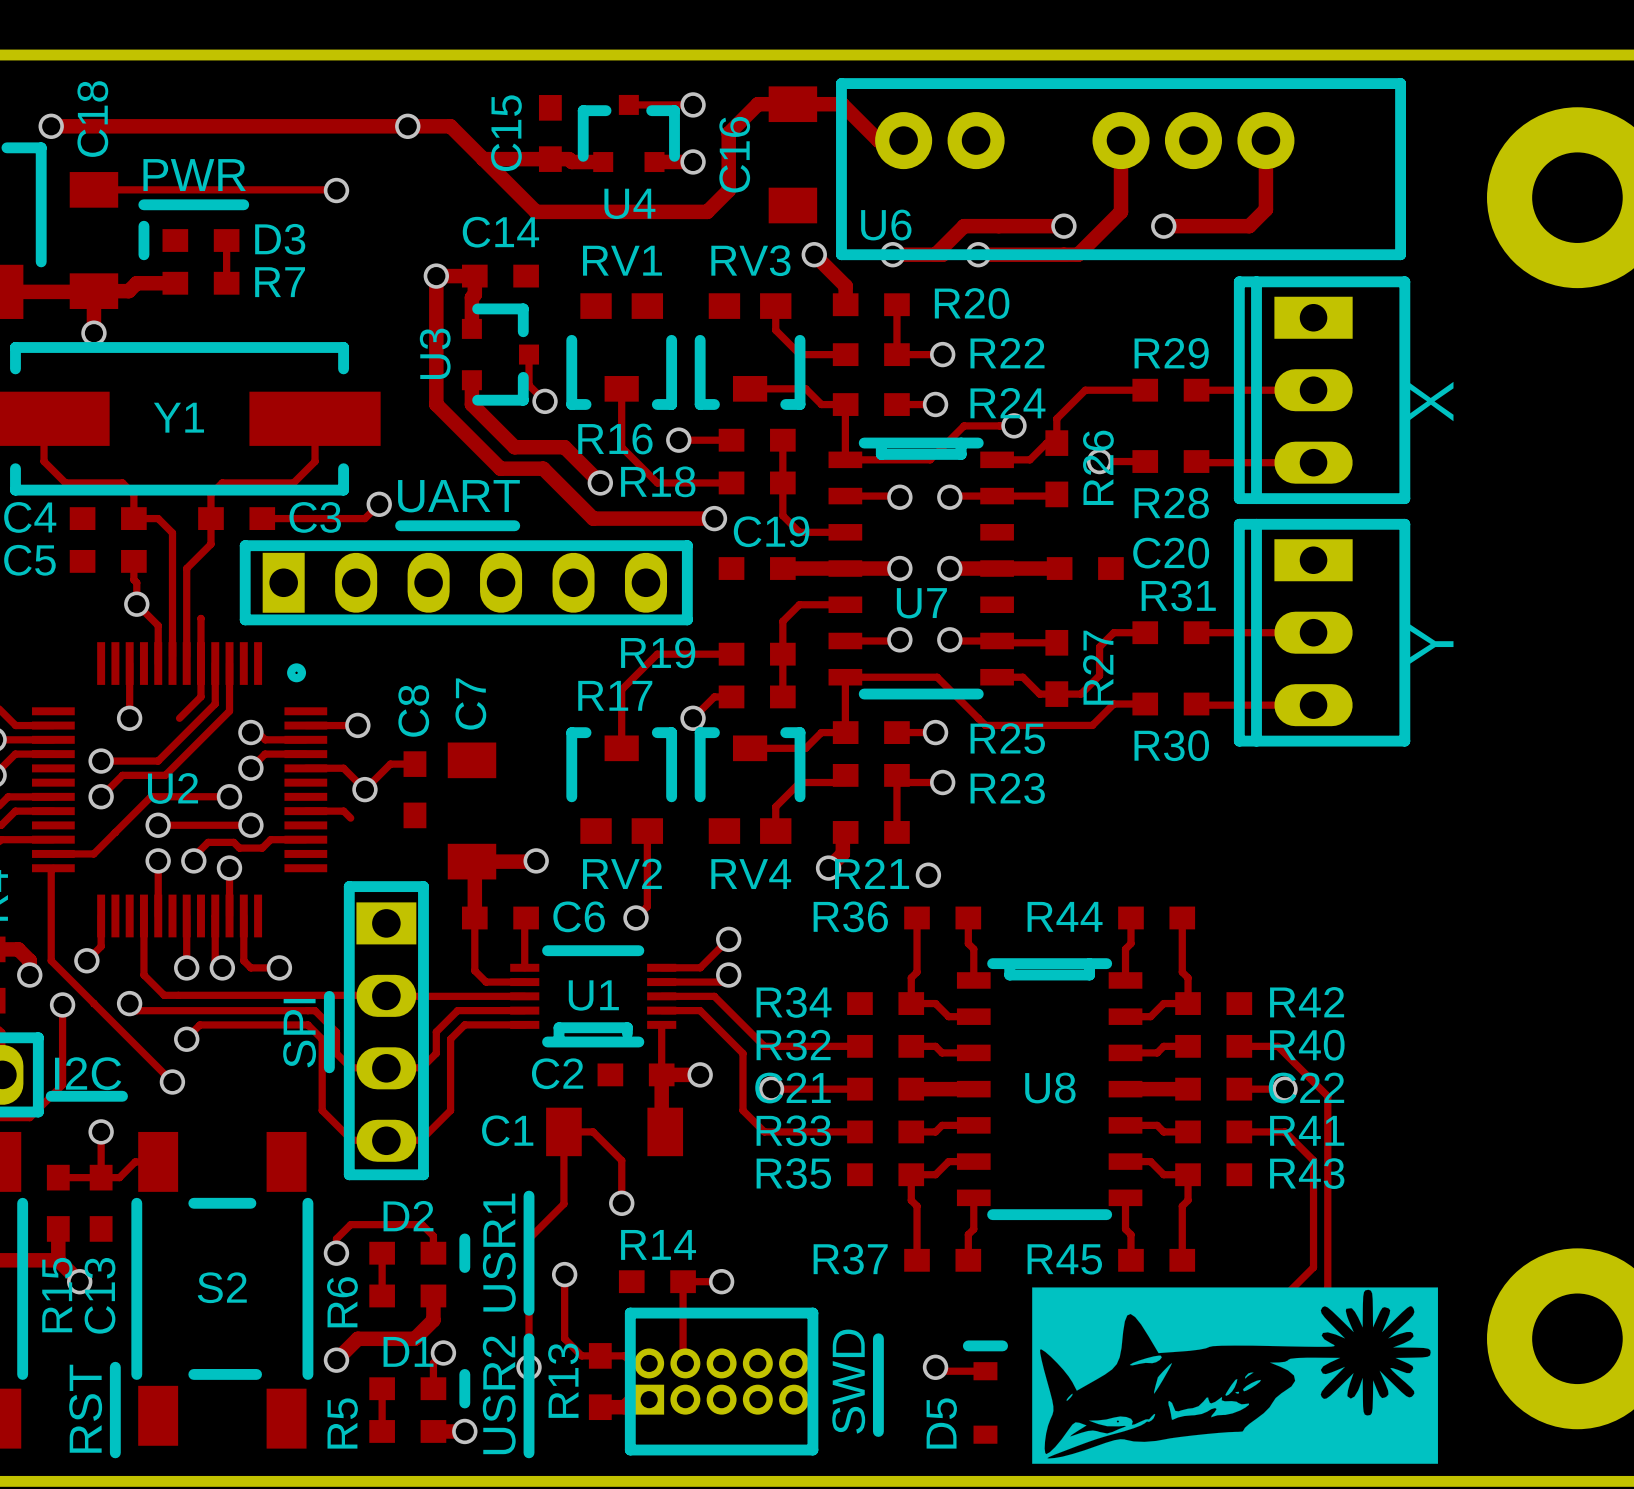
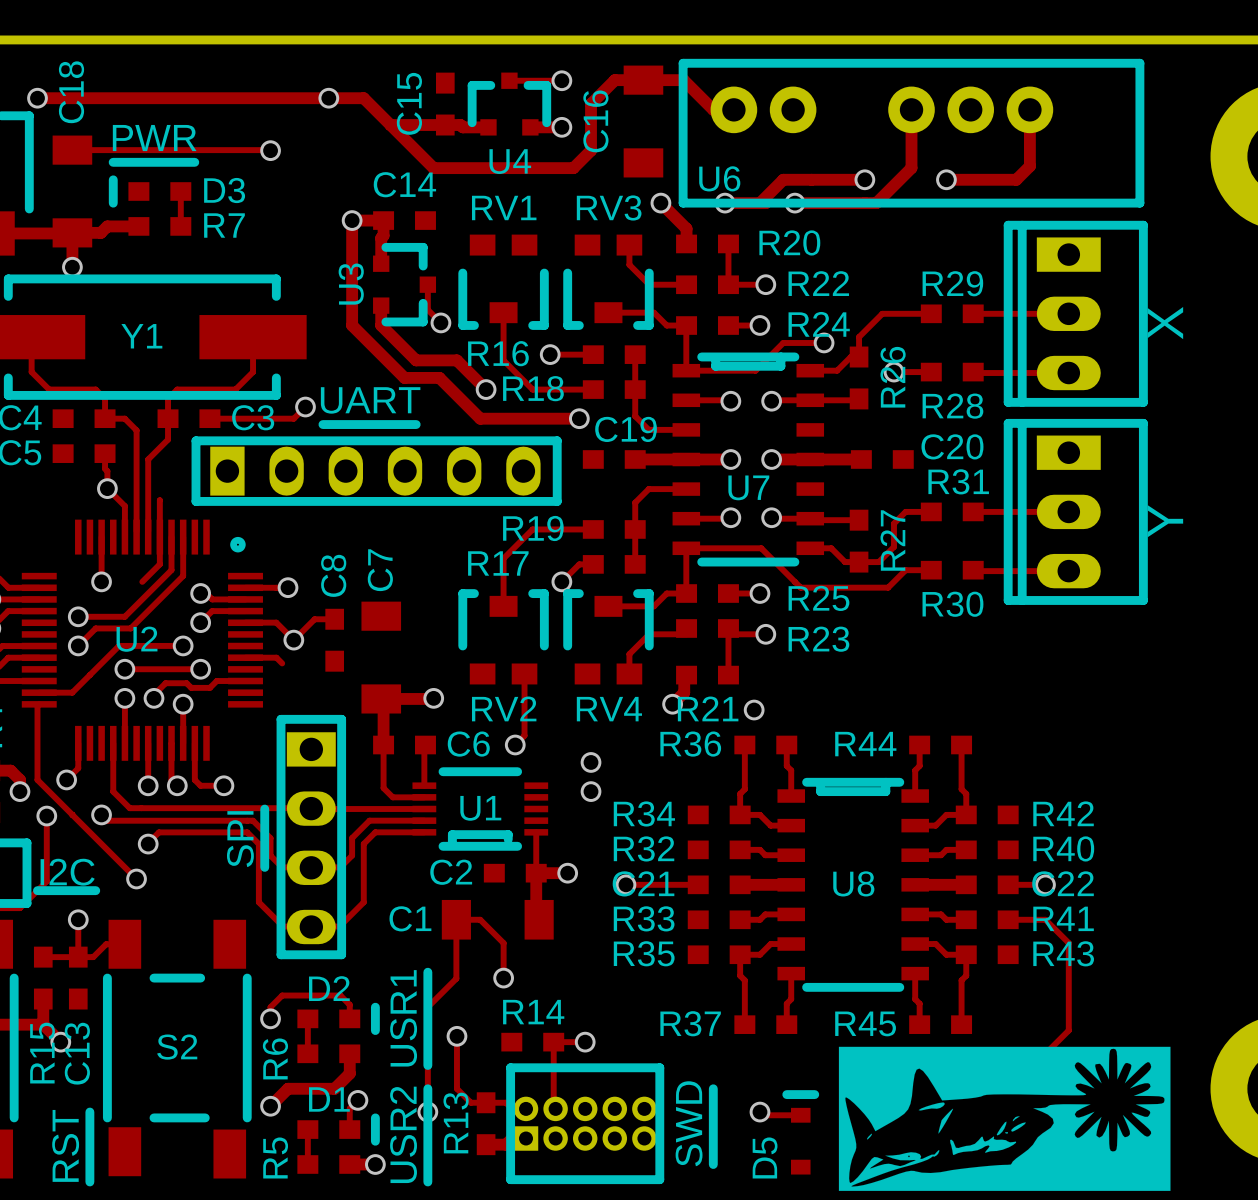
track: (728, 939) (700, 967) (661, 967) -> none
track: (728, 975) (721, 982) (661, 982) -> none
track: (661, 996) (714, 996) (764, 1046) (859, 1046) -> none
track: (661, 1010) (700, 1010) (742, 1053) (742, 1110) (764, 1131) (859, 1131) -> none
track: (1239, 1046) (1277, 1046) (1327, 1096) (1327, 1288) (1285, 1331) -> none

